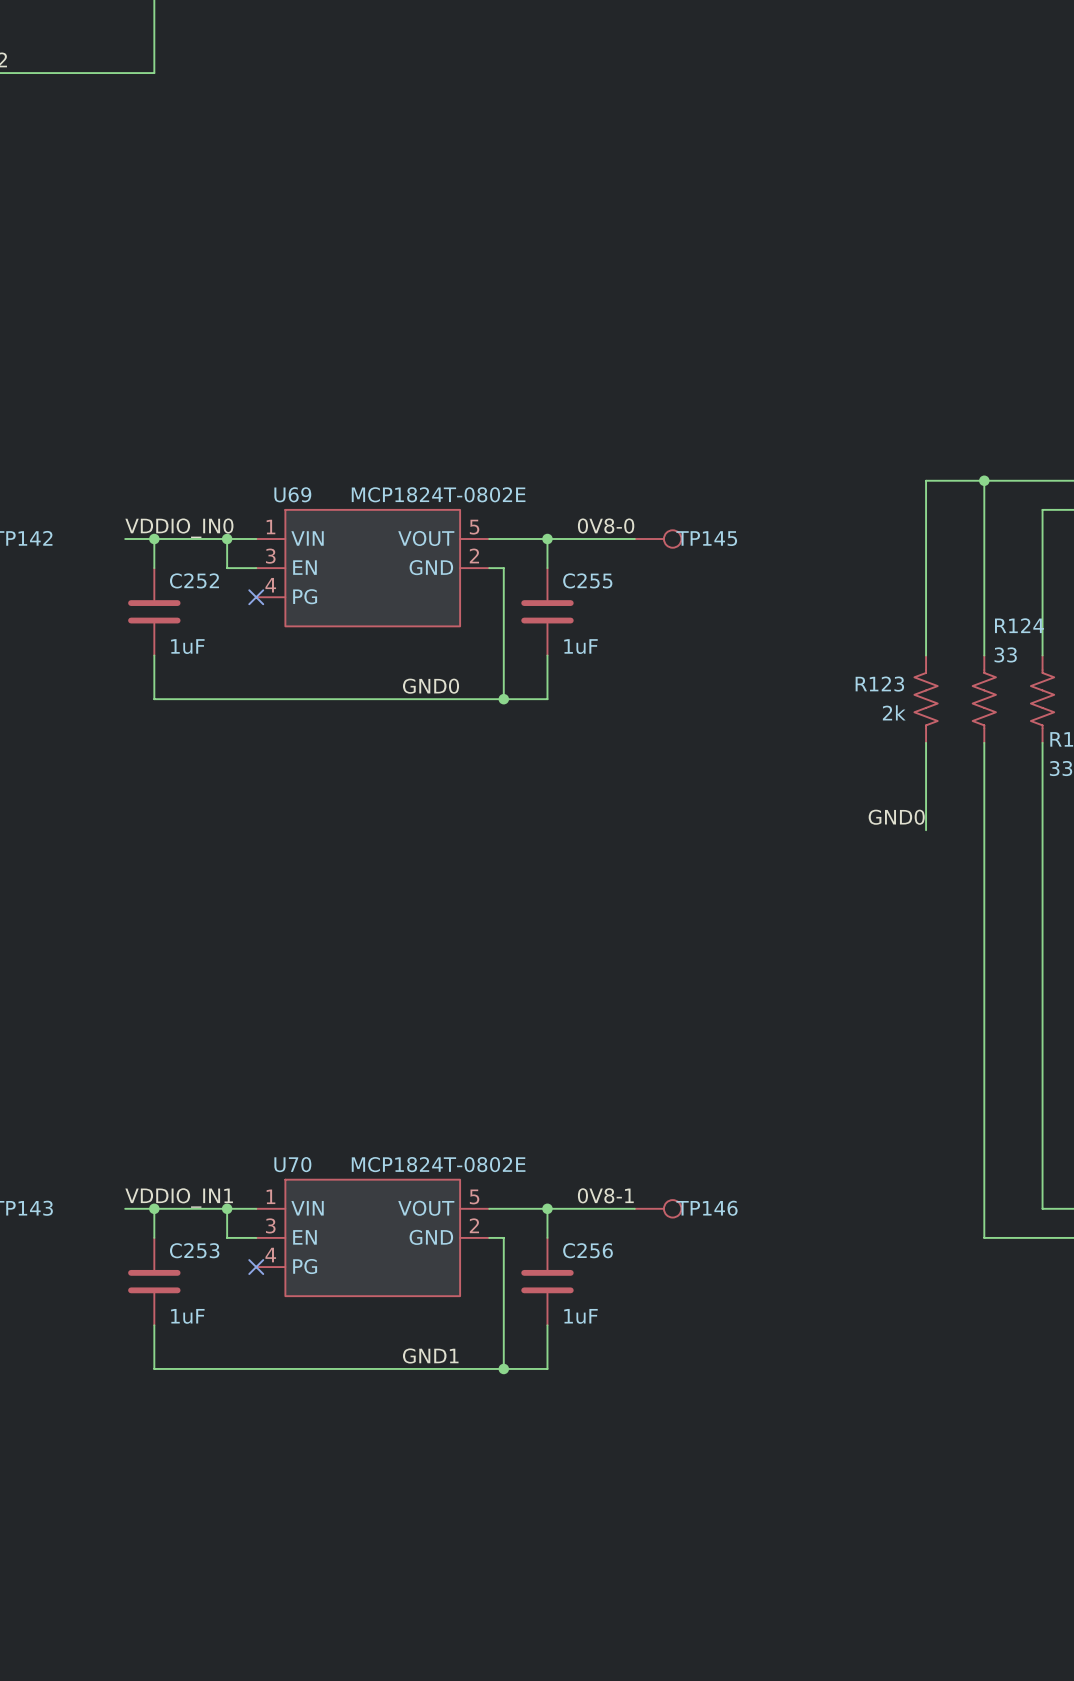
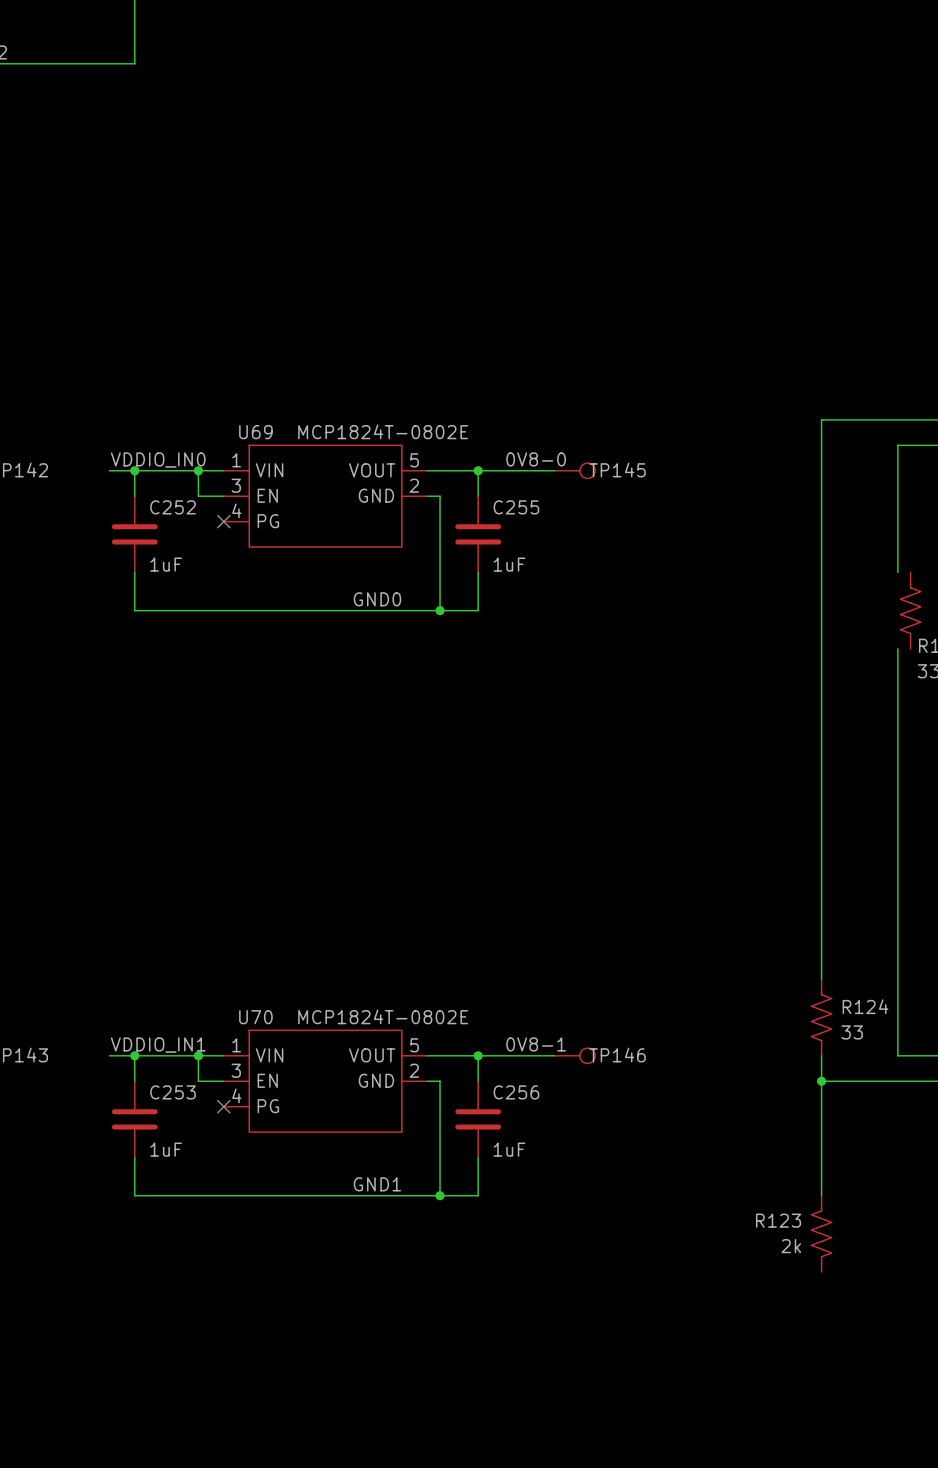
wire: (940, 480) (926, 480) (926, 655) -> (821, 419) (821, 979)
wire: (984, 480) (984, 655) -> none
junction: (984, 480) -> none
wire: (1042, 509) (1042, 655) -> (910, 445) (897, 445) (897, 572)
R124 name position: R124 (1019, 625) -> R124 (865, 1006)
R124 value position: 33 (1005, 654) -> 33 (852, 1032)
R123 position: (926, 699) -> (821, 1233)
R124 position: (984, 699) -> (821, 1017)
wire: (926, 742) (926, 830) -> none
wire: (984, 742) (984, 1237) -> (821, 1081) (859, 1081)
wire: (1042, 742) (1042, 1208) -> (897, 648) (897, 1055) (910, 1055)
label: GND0 (896, 817) -> none
wire: none -> (821, 1055) (821, 1195)
junction: none -> (821, 1081)

